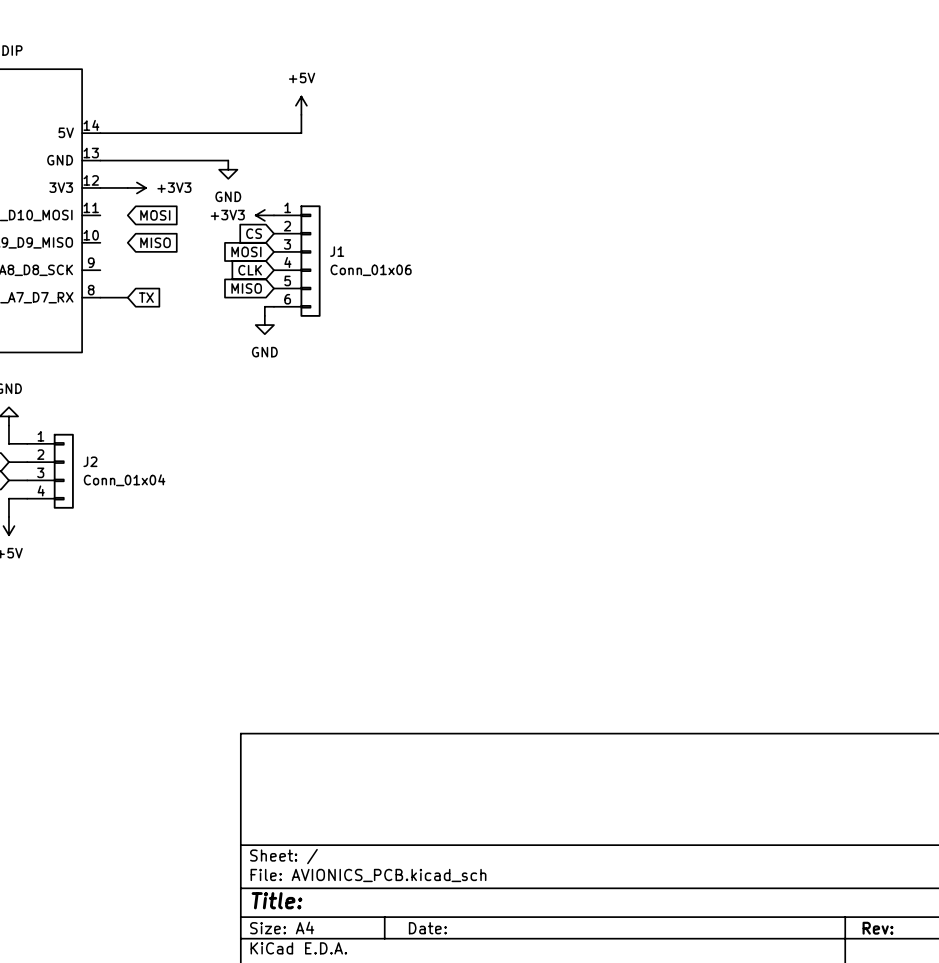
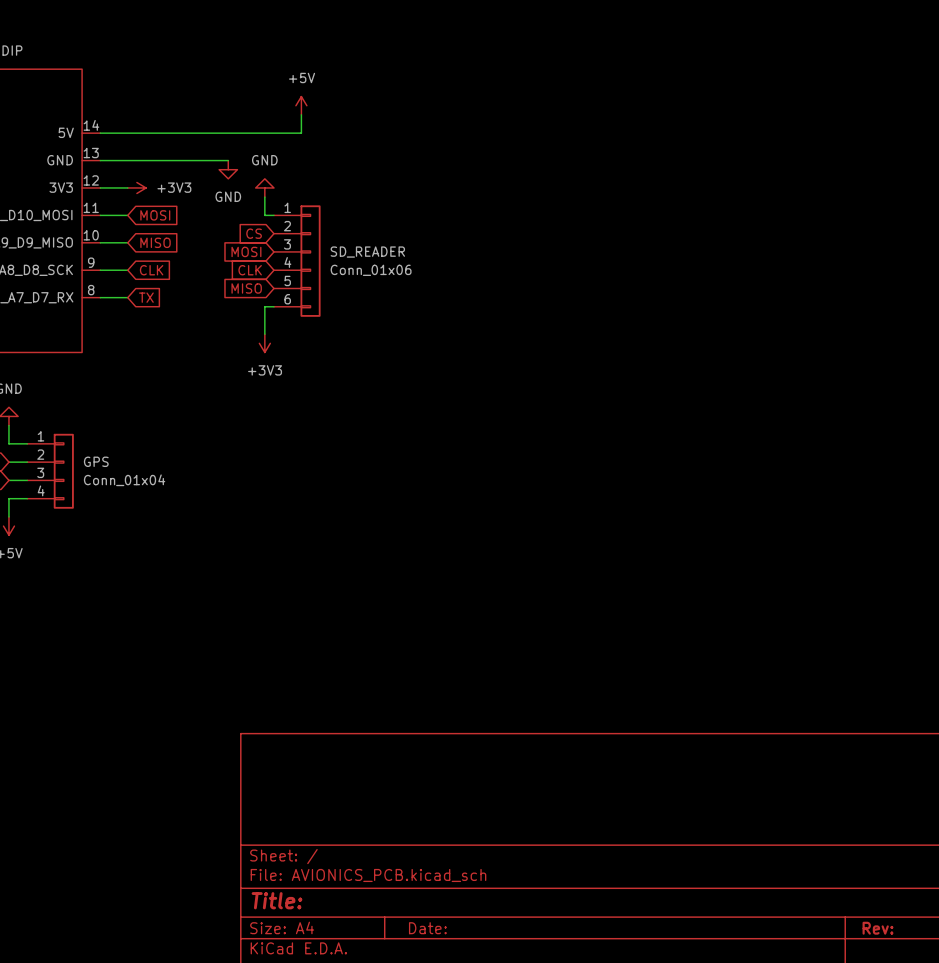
wire: none -> (264, 197) (264, 215) (273, 215)
wire: none -> (100, 215) (127, 215)
power symbol rotation: 0° (264, 215) -> 90° counterclockwise (264, 343)
power symbol position: +3V3 (264, 215) -> +3V3 (264, 343)
wire: none -> (100, 242) (127, 242)
J1 name: J1 (337, 251) -> SD_READER (367, 252)
wire: none -> (100, 270) (127, 270)
global label: none -> CLK (151, 270)
power symbol rotation: 0° (264, 325) -> 180° (264, 187)
power symbol position: GND (264, 325) -> GND (264, 187)
J2 name: J2 (90, 461) -> GPS (96, 461)

